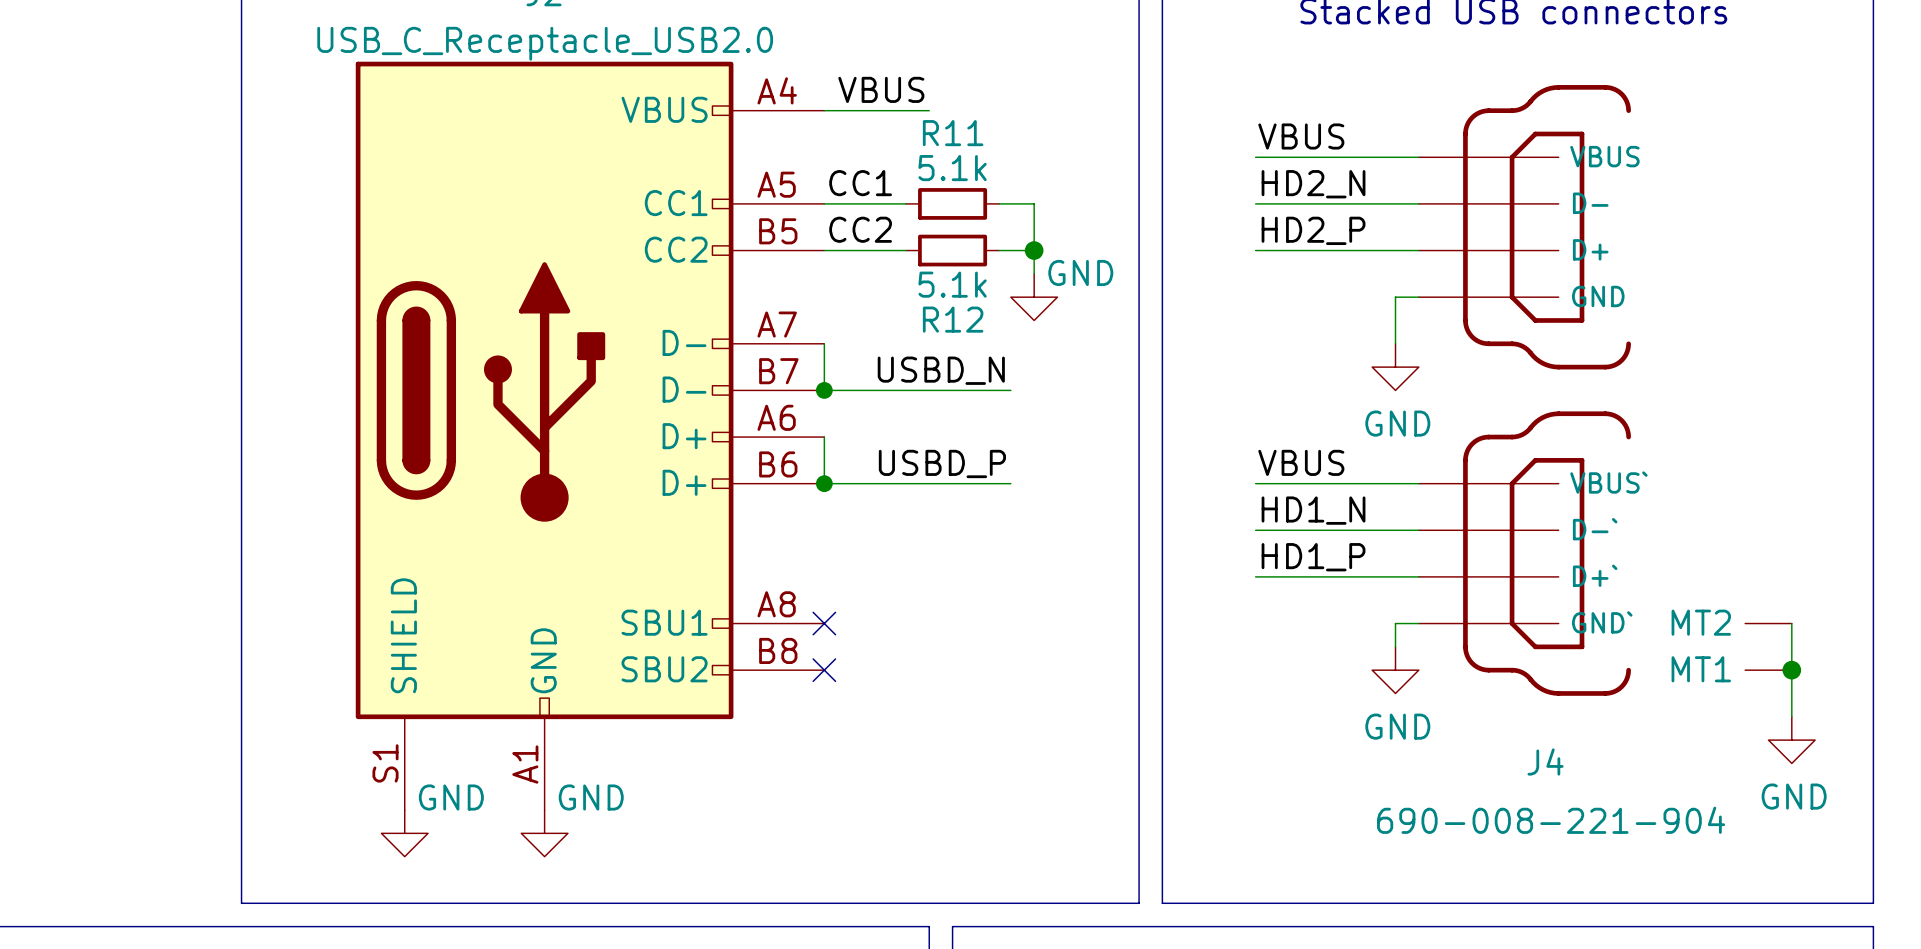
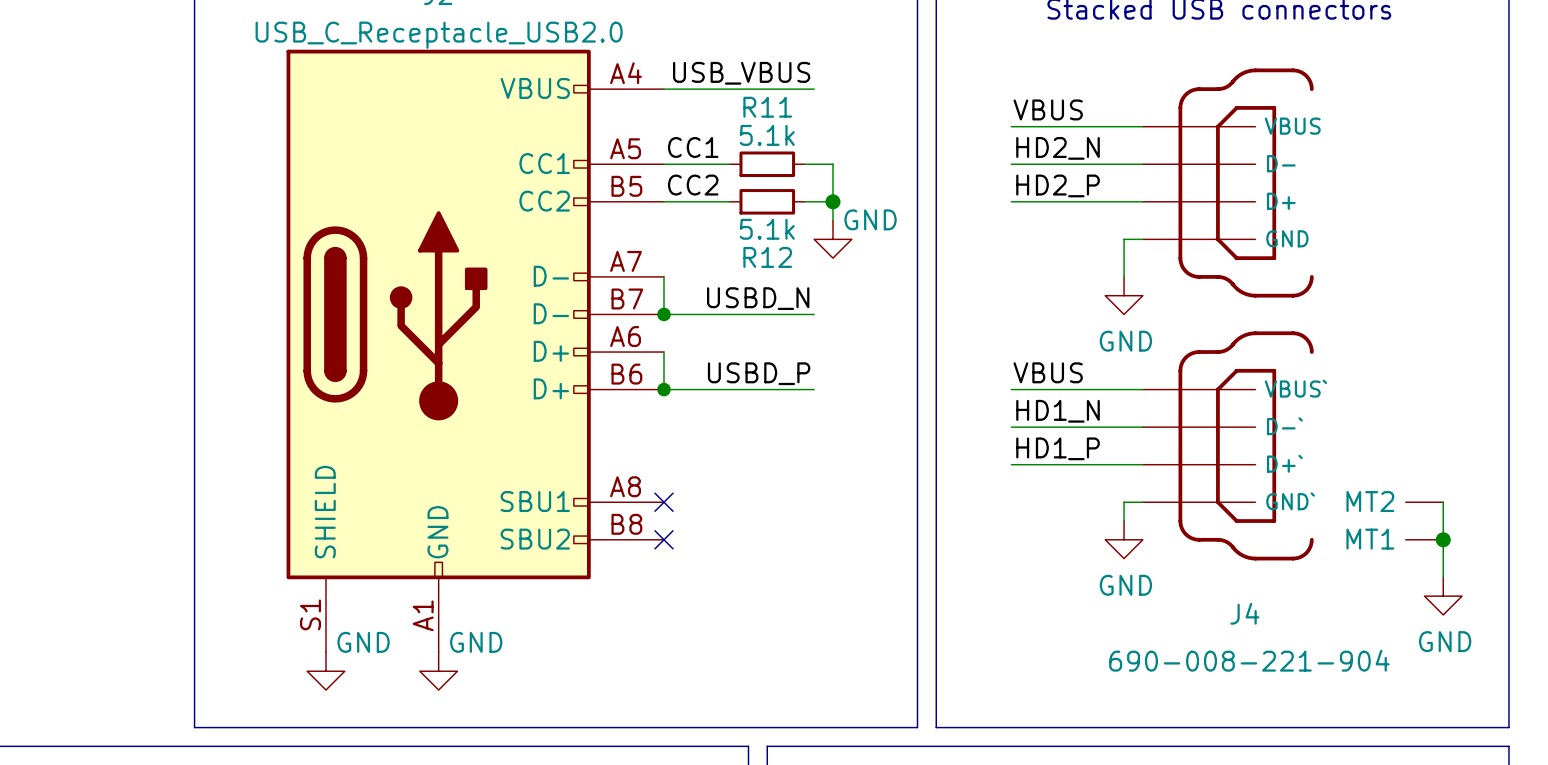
label: VBUS (881, 89) -> USB_VBUS (741, 73)
wire: none -> (748, 89) (814, 89)

